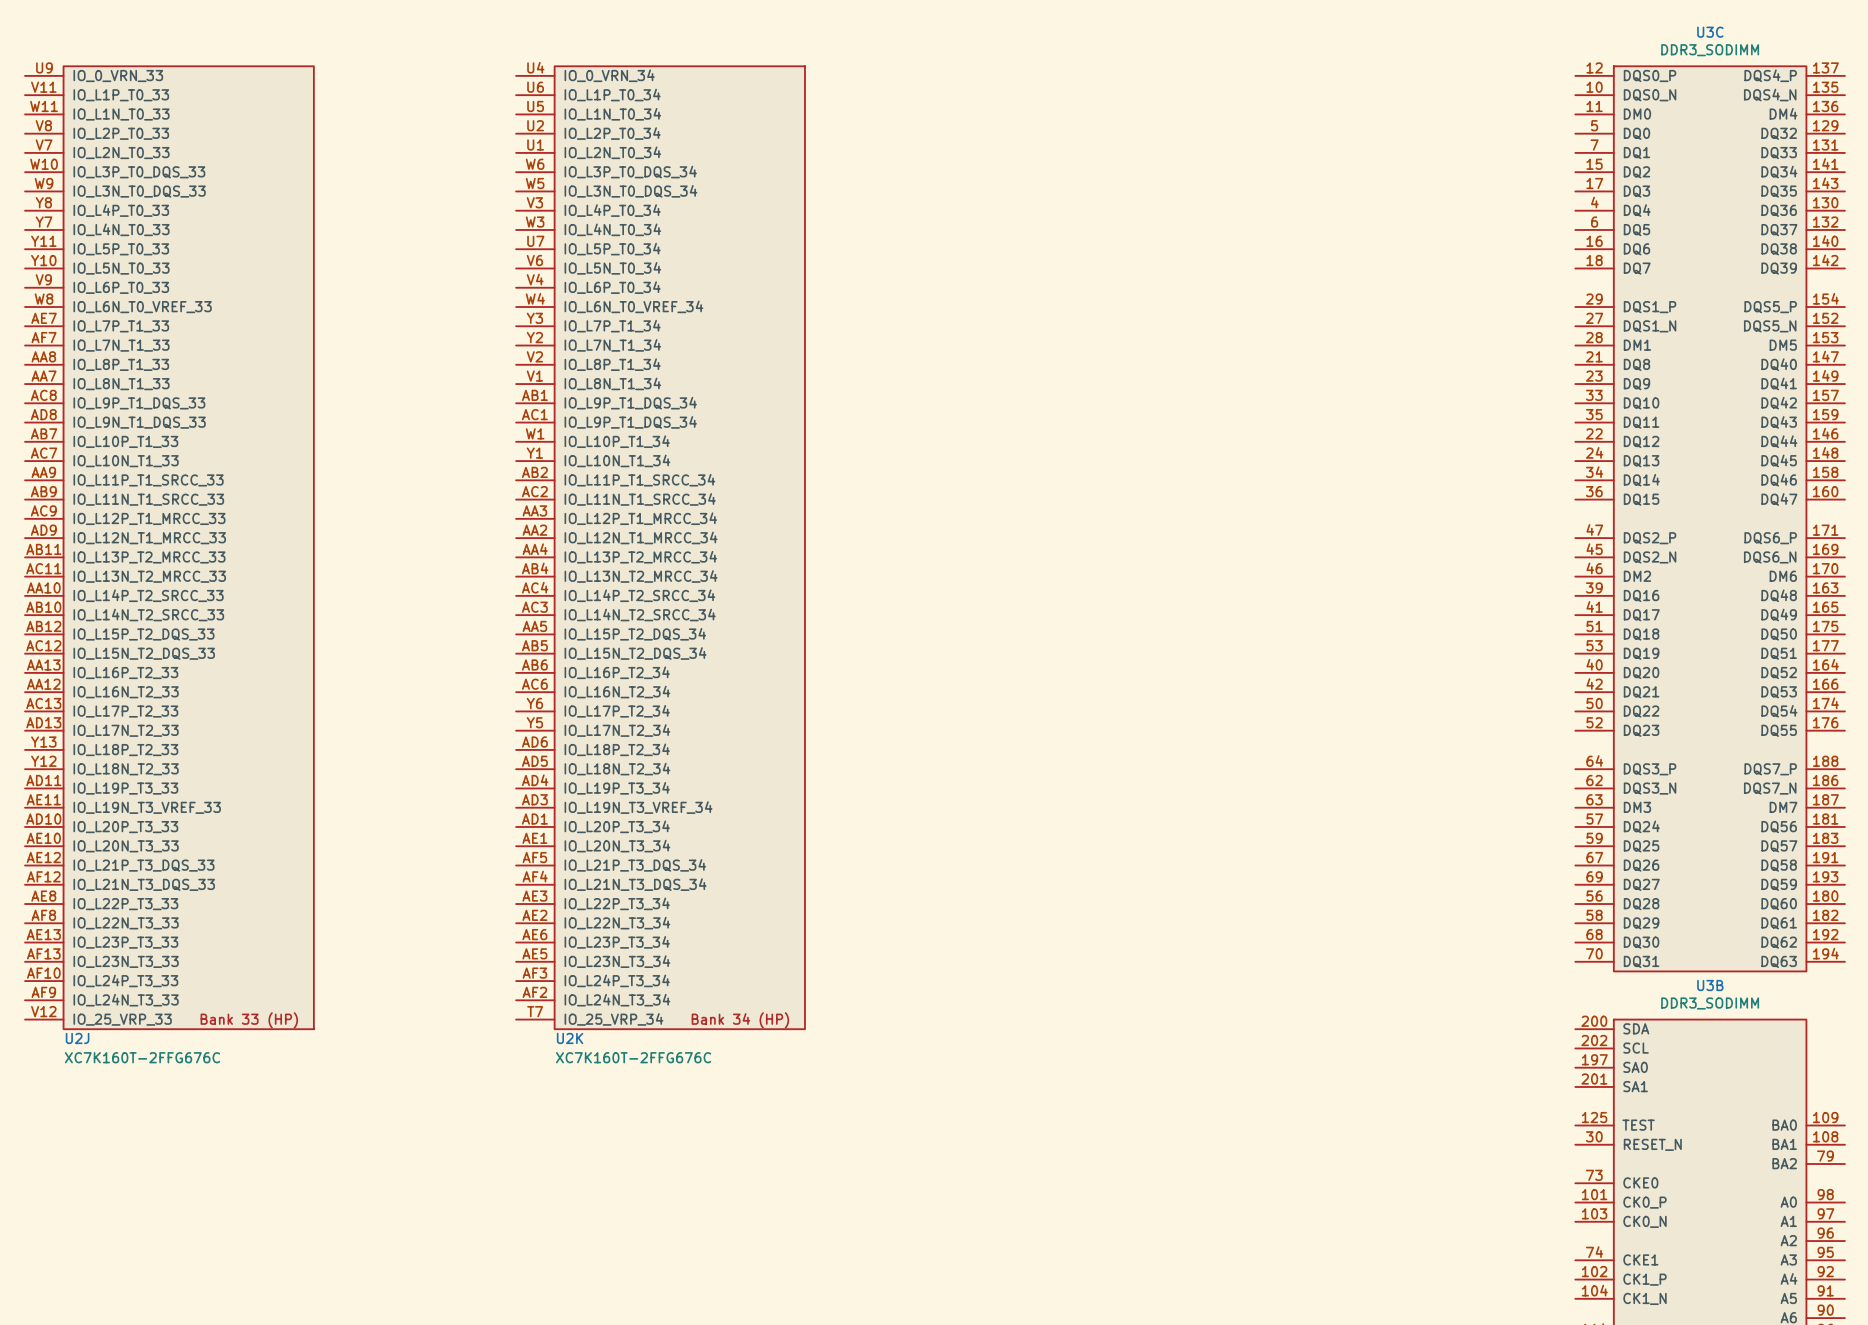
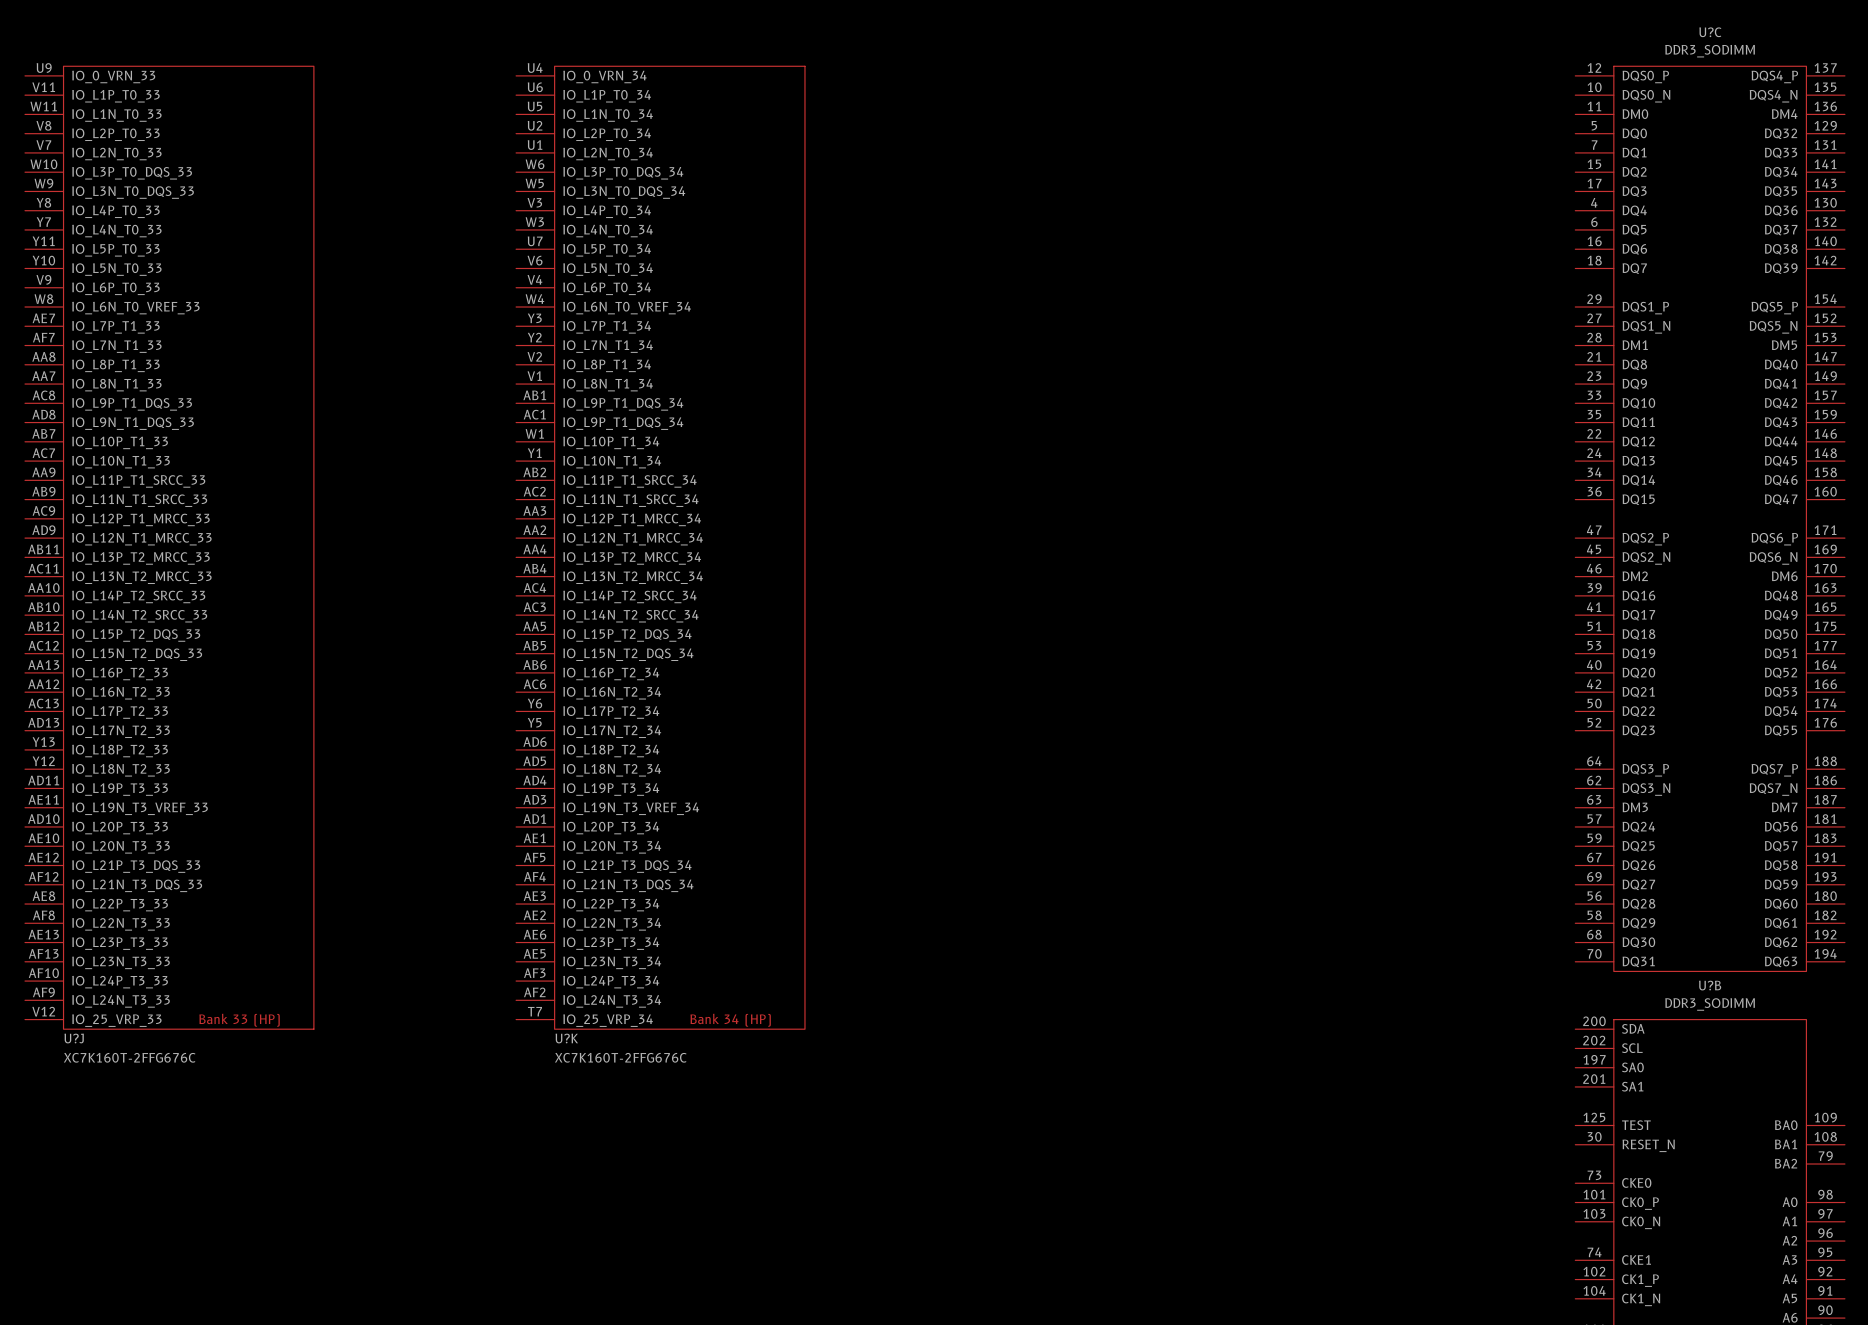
U3C name: U3C (1710, 32) -> U?C (1710, 32)
U3B name: U3B (1710, 985) -> U?B (1710, 985)
U2J name: U2J (77, 1038) -> U?J (74, 1038)
U2K name: U2K (570, 1038) -> U?K (566, 1038)

